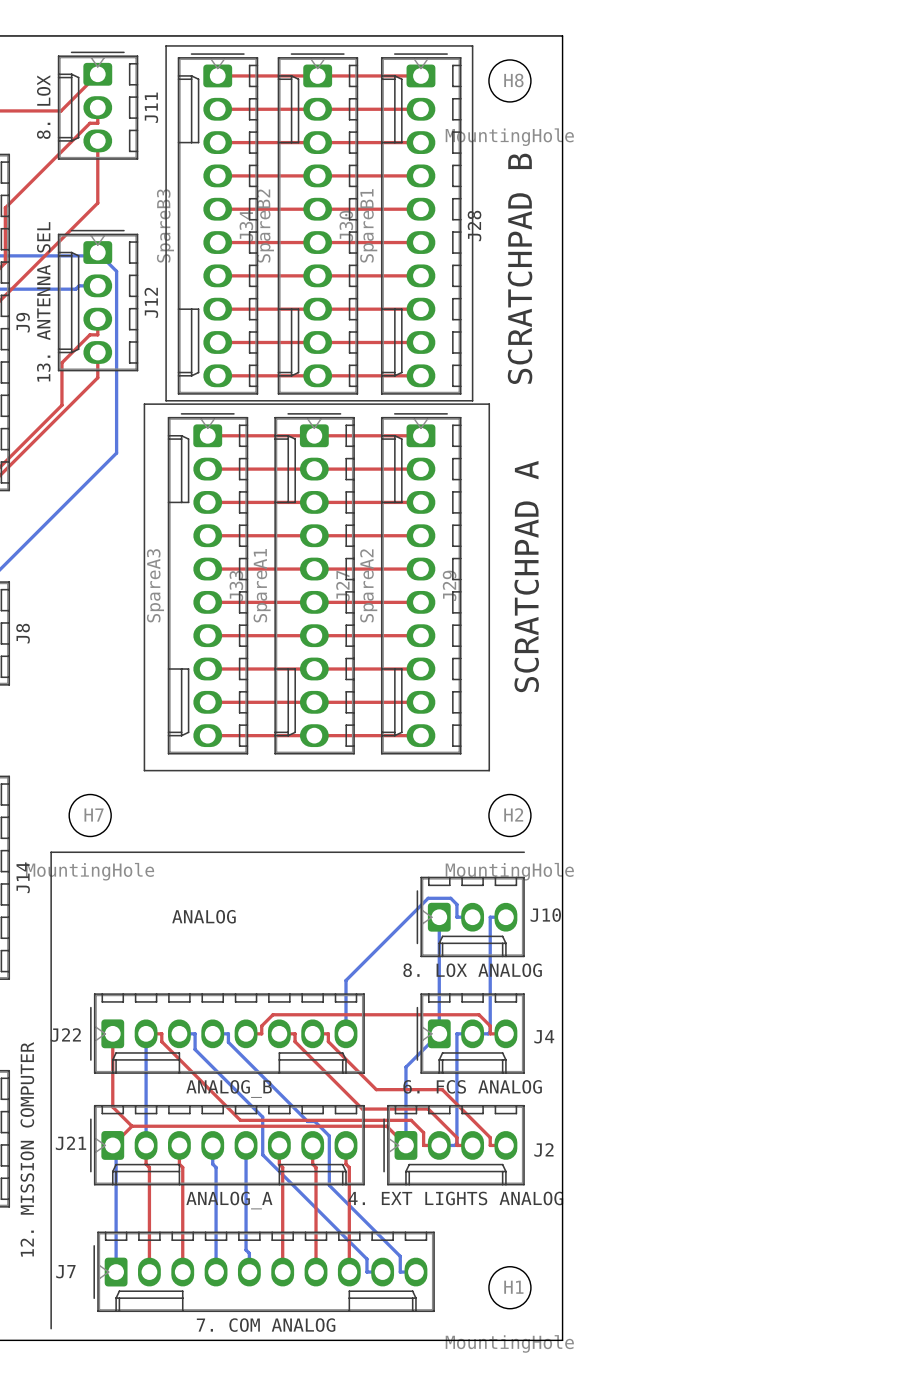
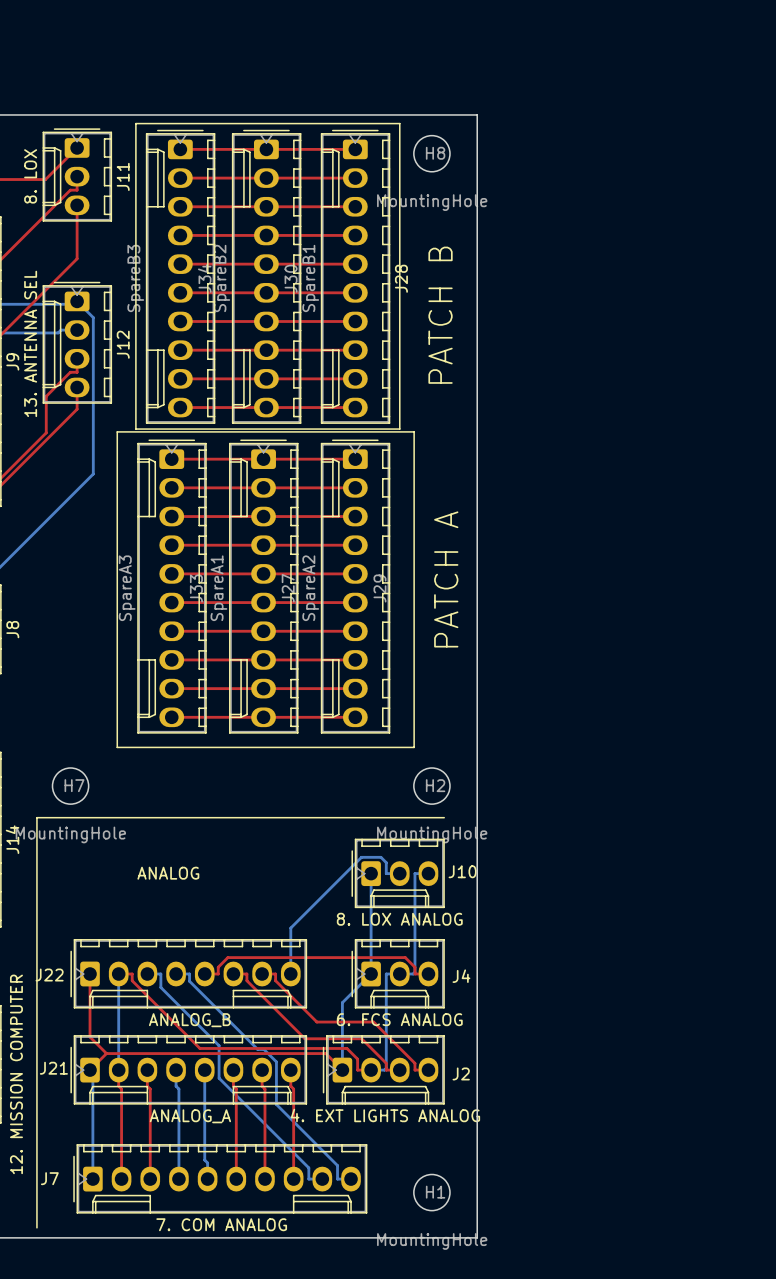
text: SCRATCHPAD B (520, 268) -> PATCH B (440, 315)
text: SCRATCHPAD A (526, 576) -> PATCH A (446, 579)

